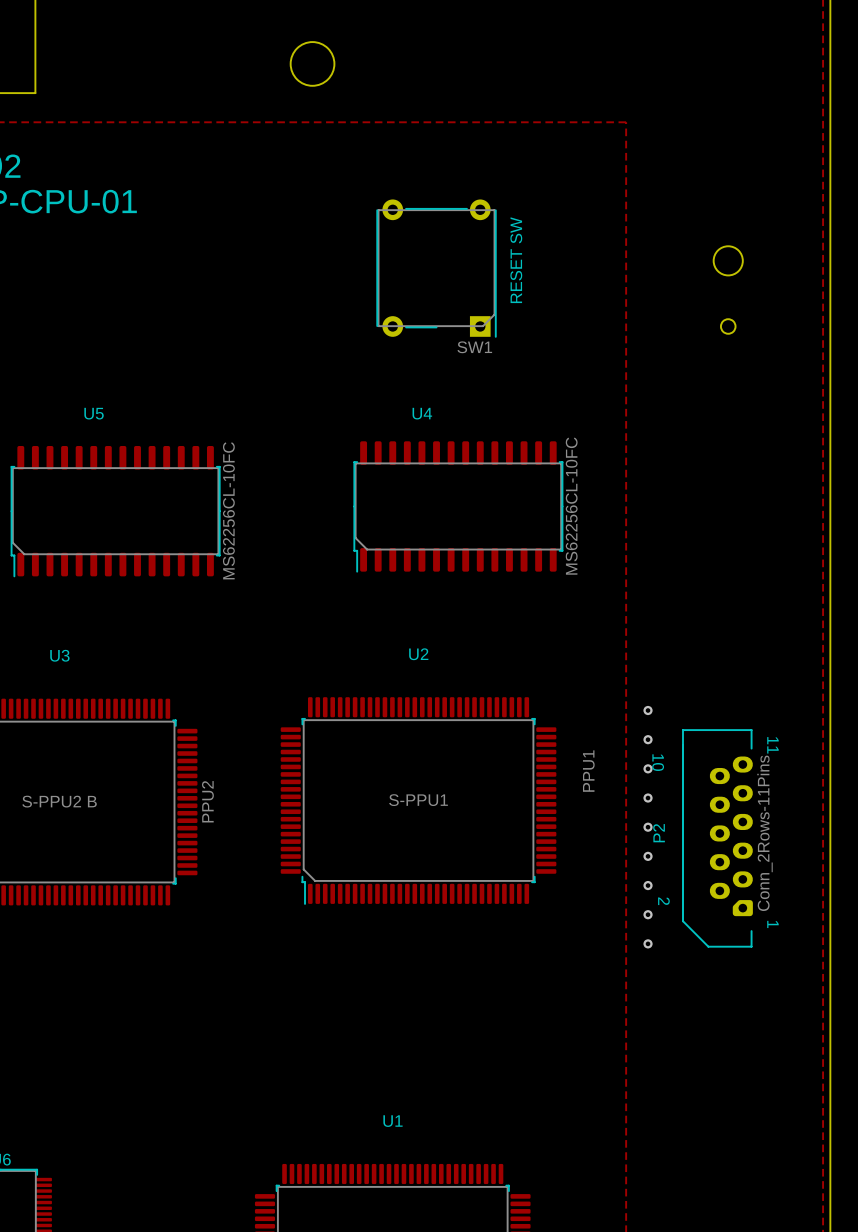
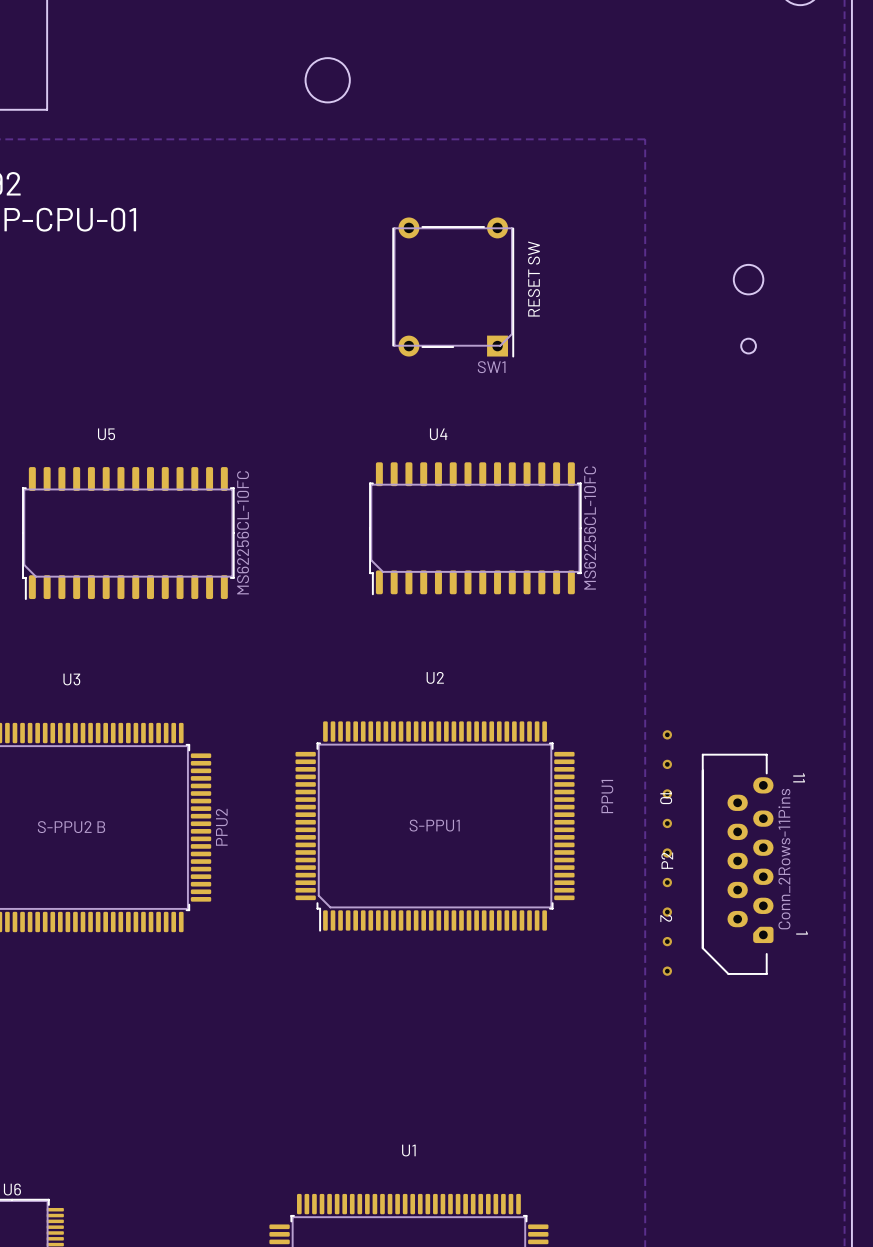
P2 footprint: [682, 729, 753, 948] -> [702, 753, 774, 975]

